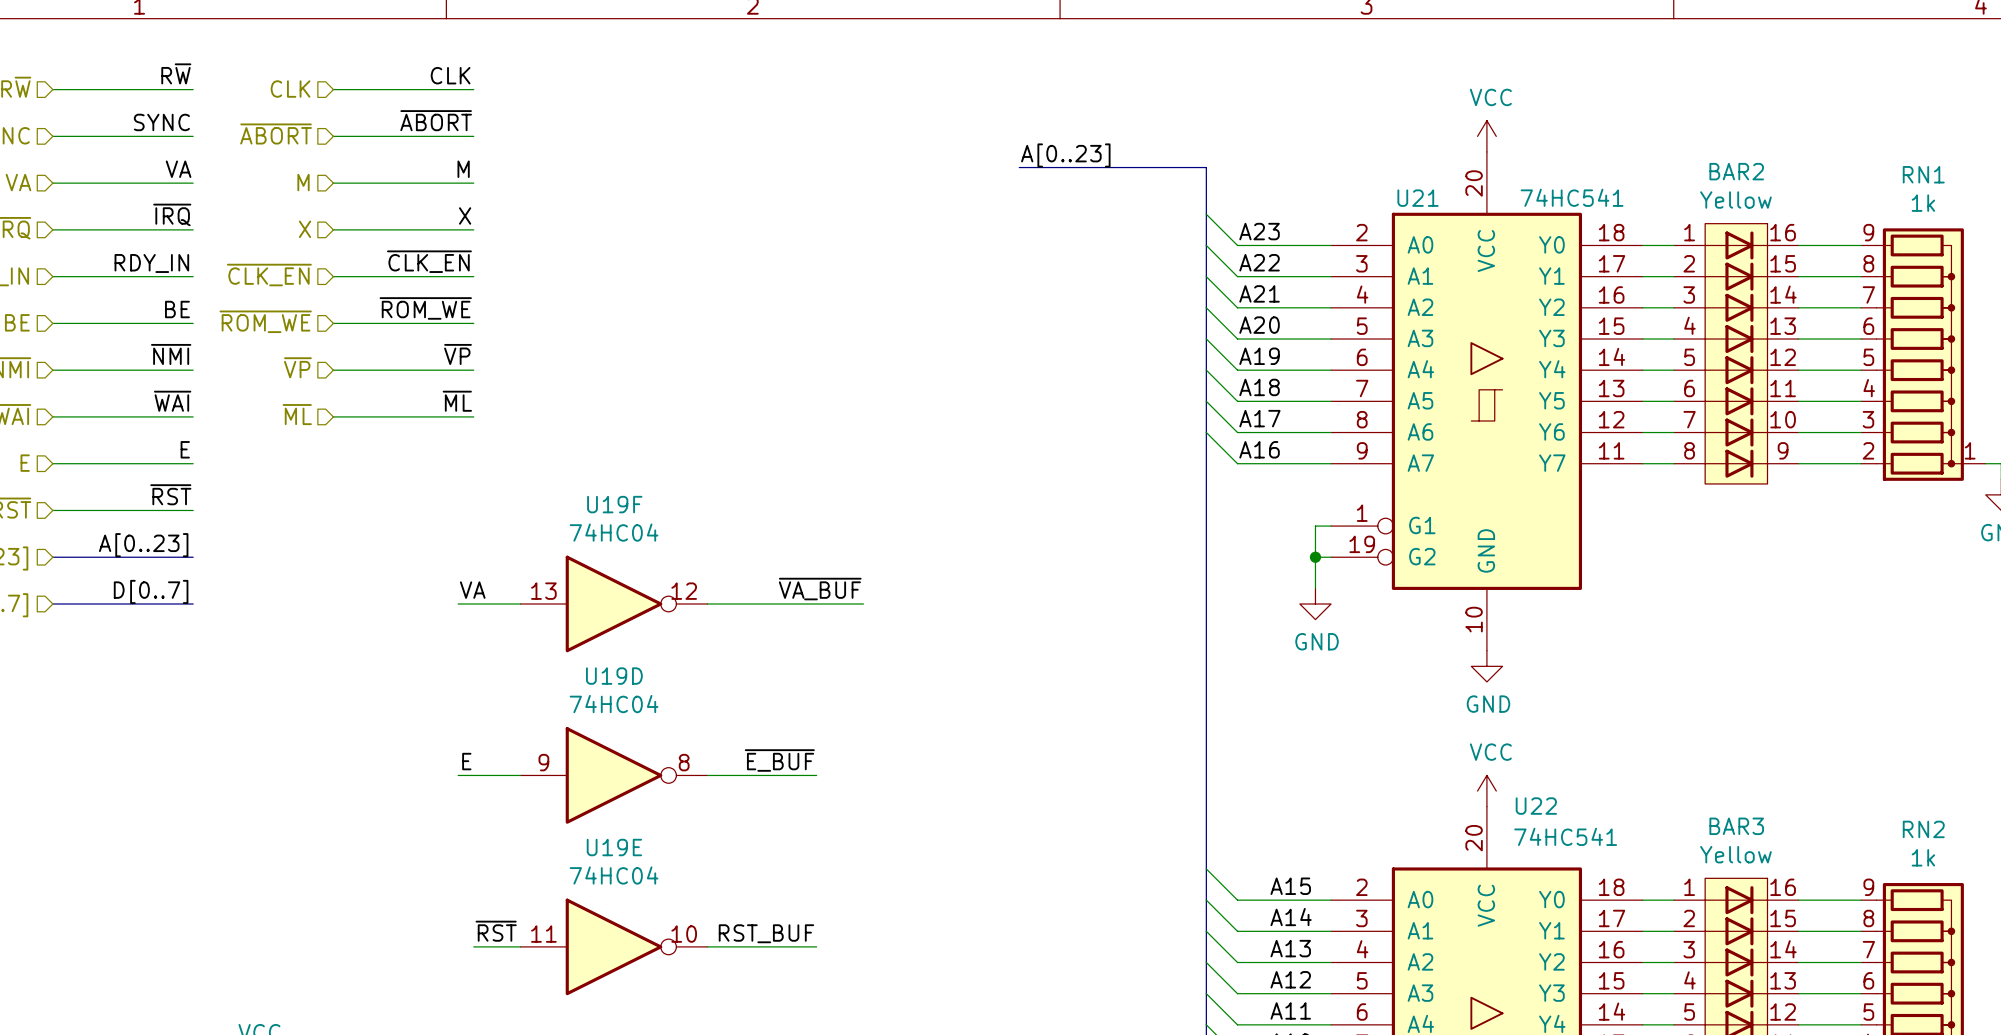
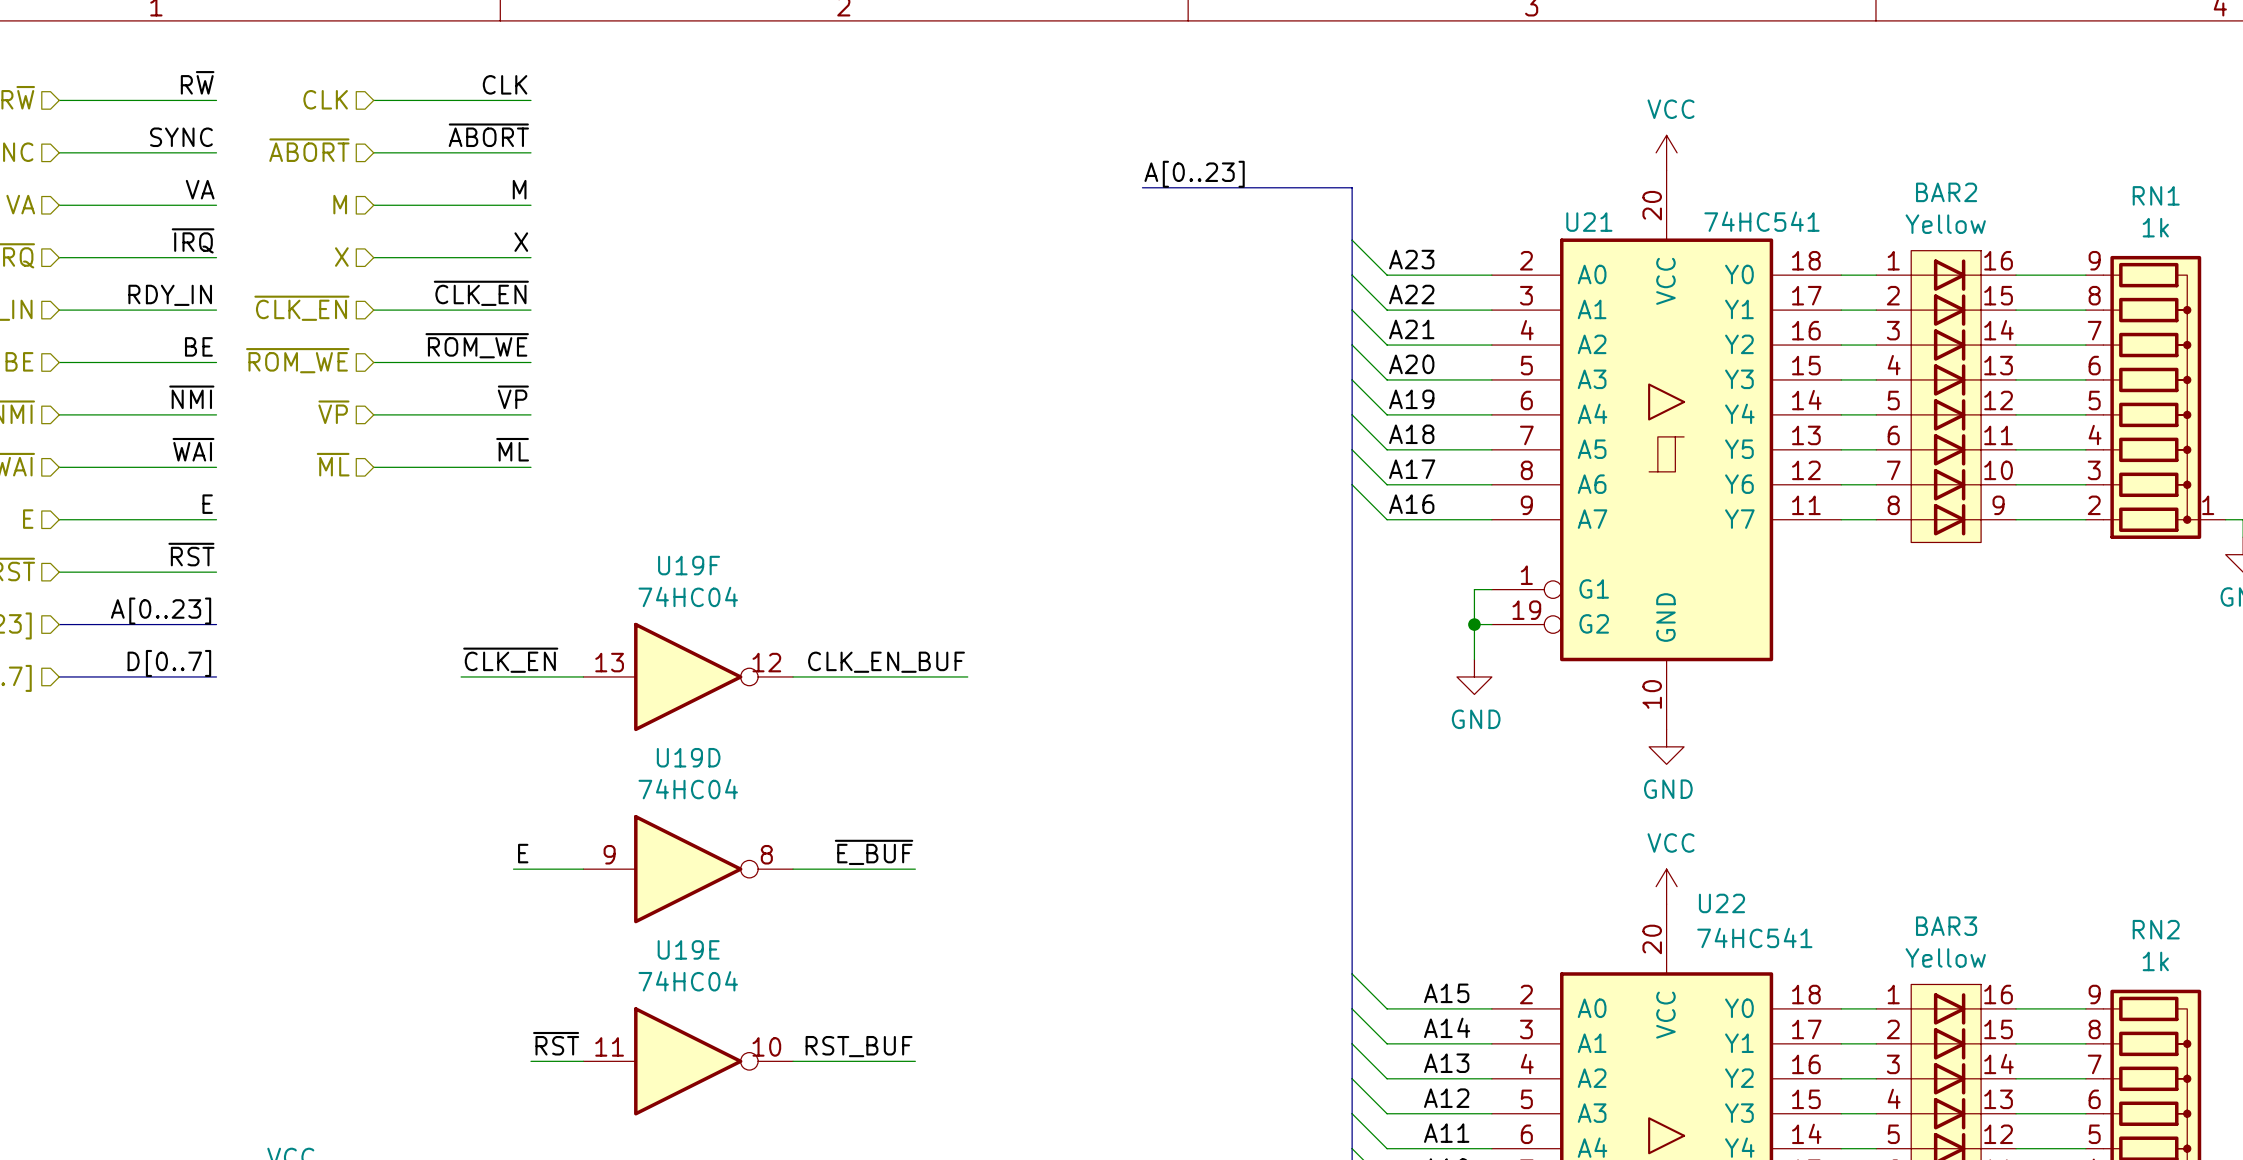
label: none -> ~{CLK_EN} (510, 660)
label: ~{VA_BUF} (820, 589) -> CLK_EN_BUF (886, 662)
label: VA (472, 590) -> none
wire: none -> (461, 676) (513, 676)

